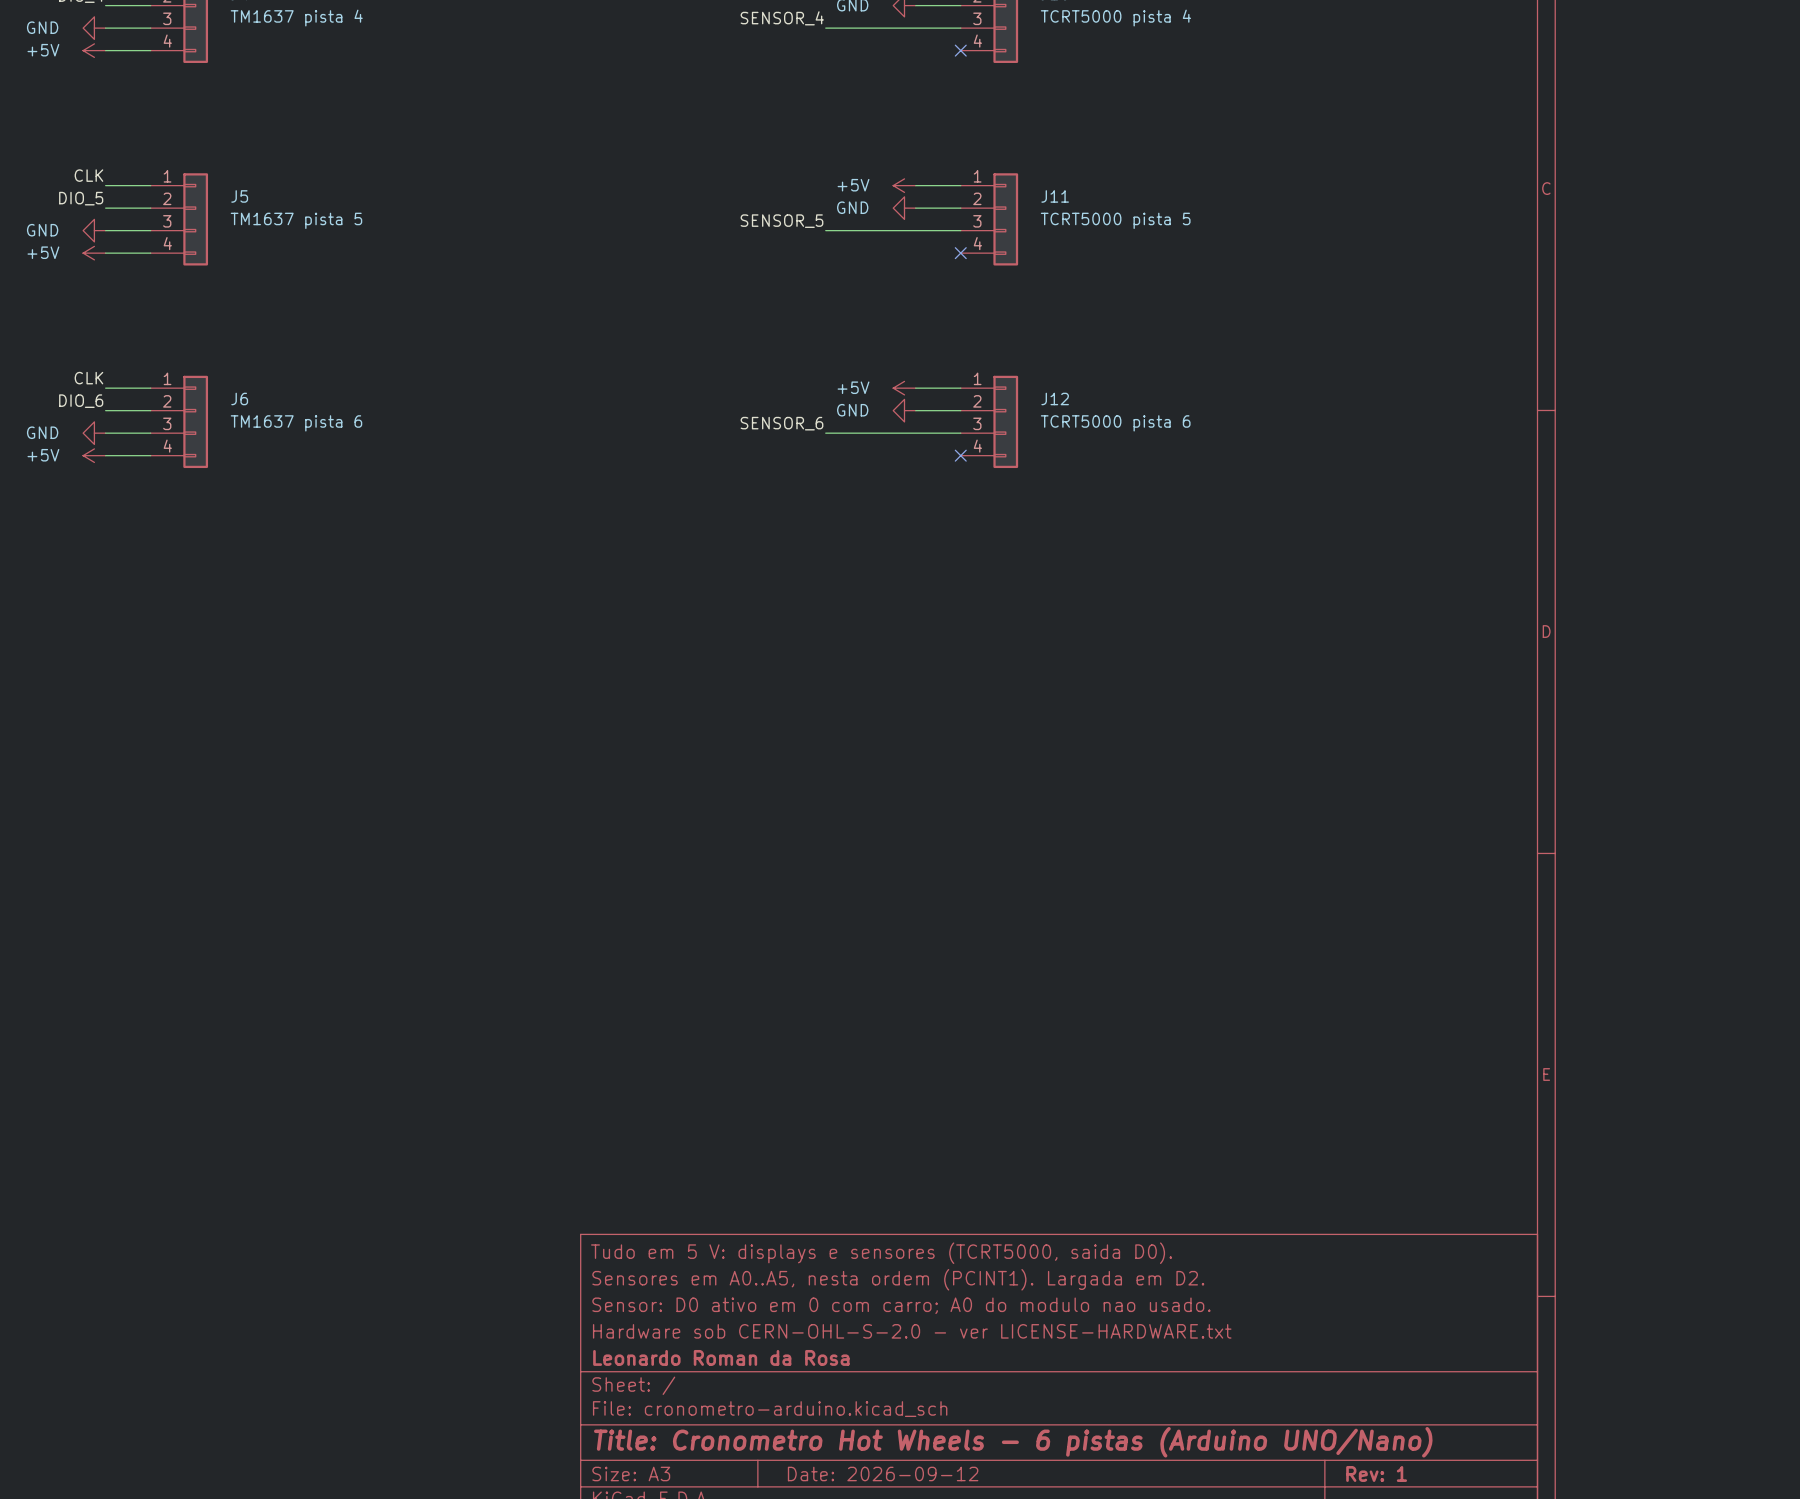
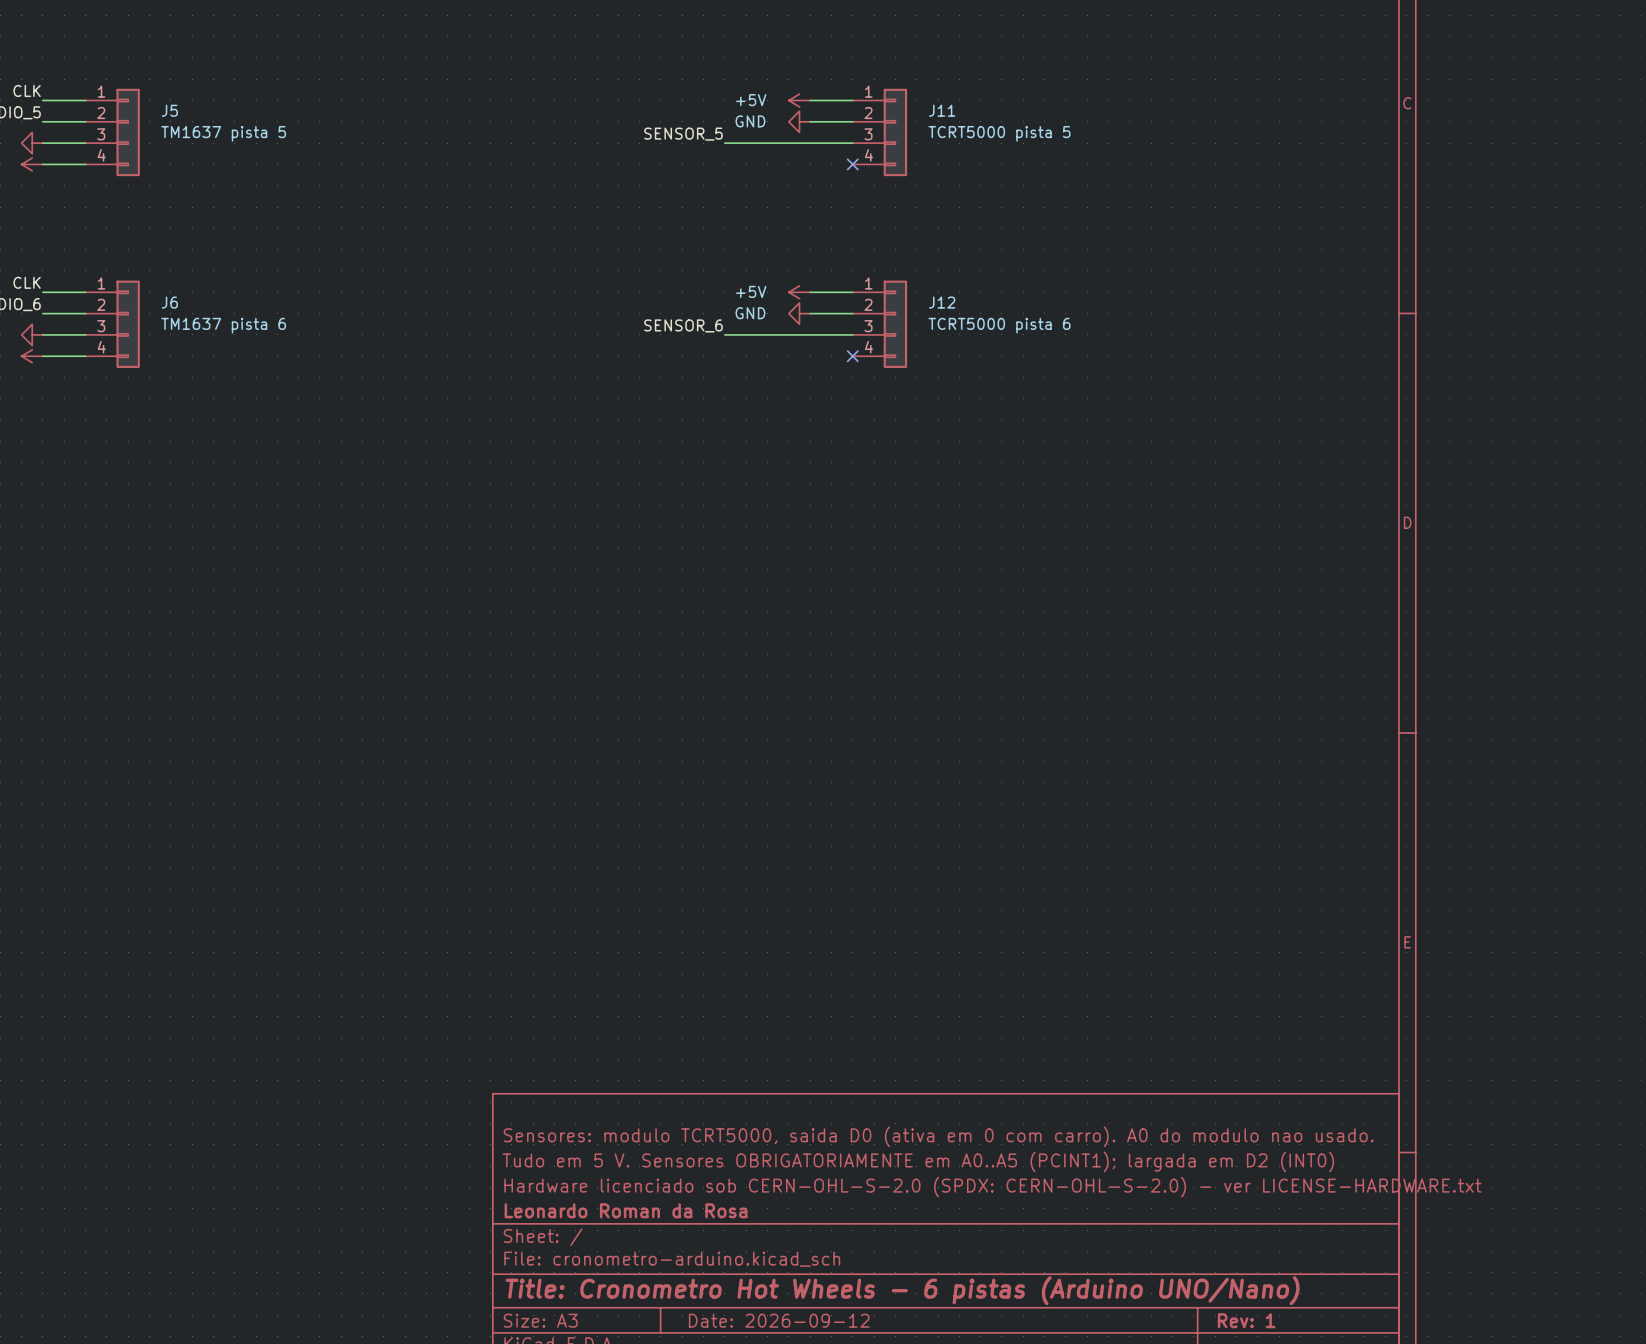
title block: Tudo em 5 V: displays e sensores (TCRT5000, saida D0). (881, 1253) -> none
title block: Sensores em A0..A5, nesta ordem (PCINT1). Largada em D2. (898, 1279) -> Sensores: modulo TCRT5000, saida D0 (ativa em 0 com carro). A0 do modulo nao usado. (938, 1136)
title block: Sensor: D0 ativo em 0 com carro; A0 do modulo nao usado. (901, 1305) -> Tudo em 5 V. Sensores OBRIGATORIAMENTE em A0..A5 (PCINT1); largada em D2 (INT0) (918, 1161)
title block: Hardware sob CERN-OHL-S-2.0 - ver LICENSE-HARDWARE.txt (912, 1331) -> Hardware licenciado sob CERN-OHL-S-2.0 (SPDX: CERN-OHL-S-2.0) - ver LICENSE-HARDWARE.txt (992, 1187)

